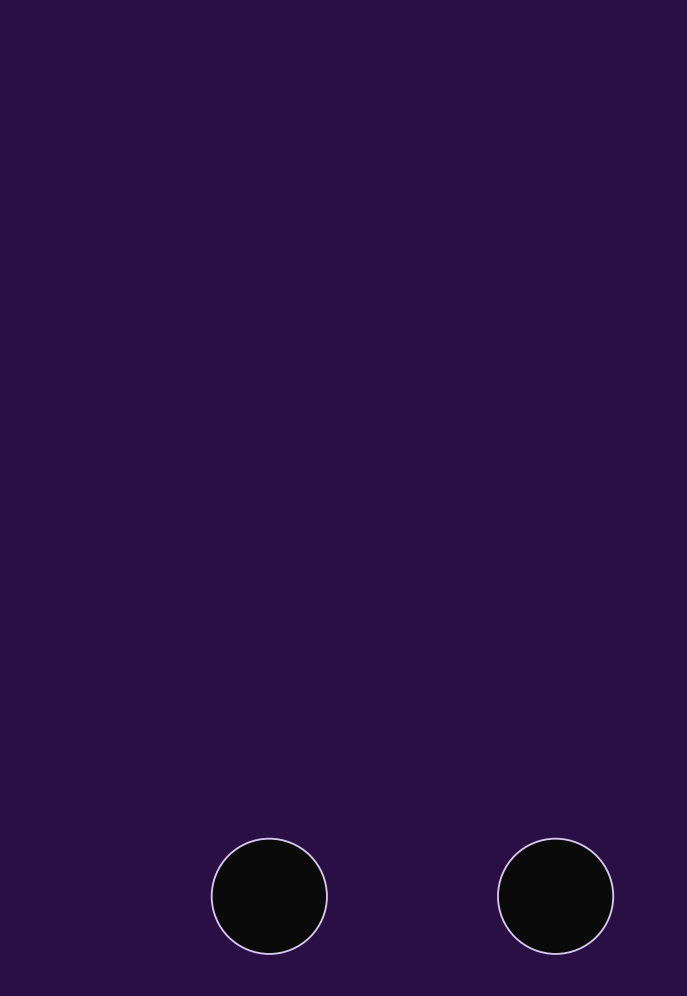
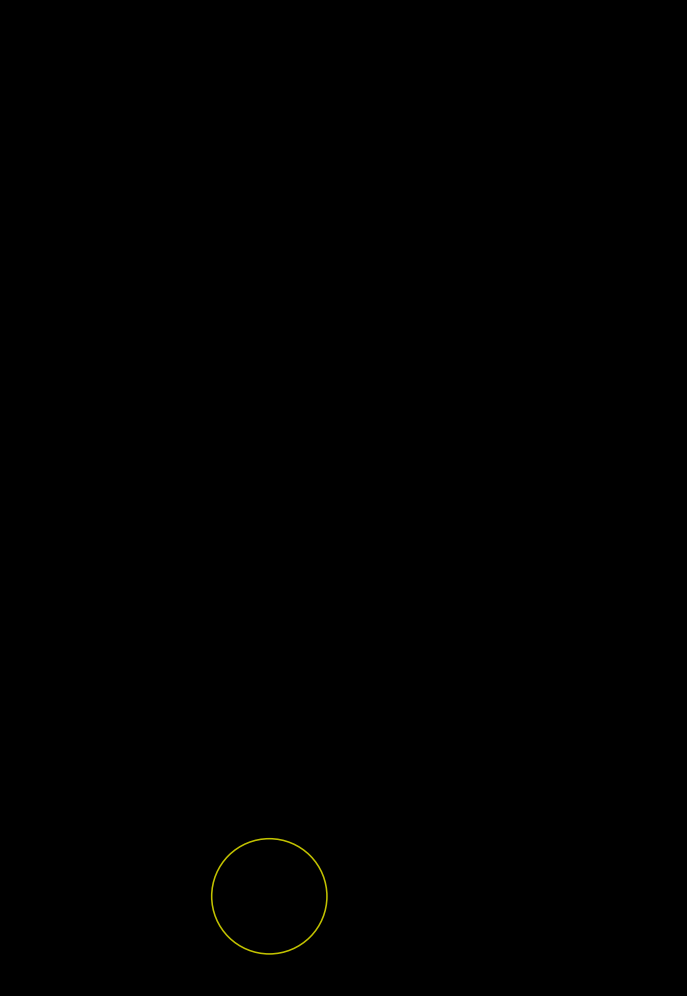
part: (555, 896) -> none

